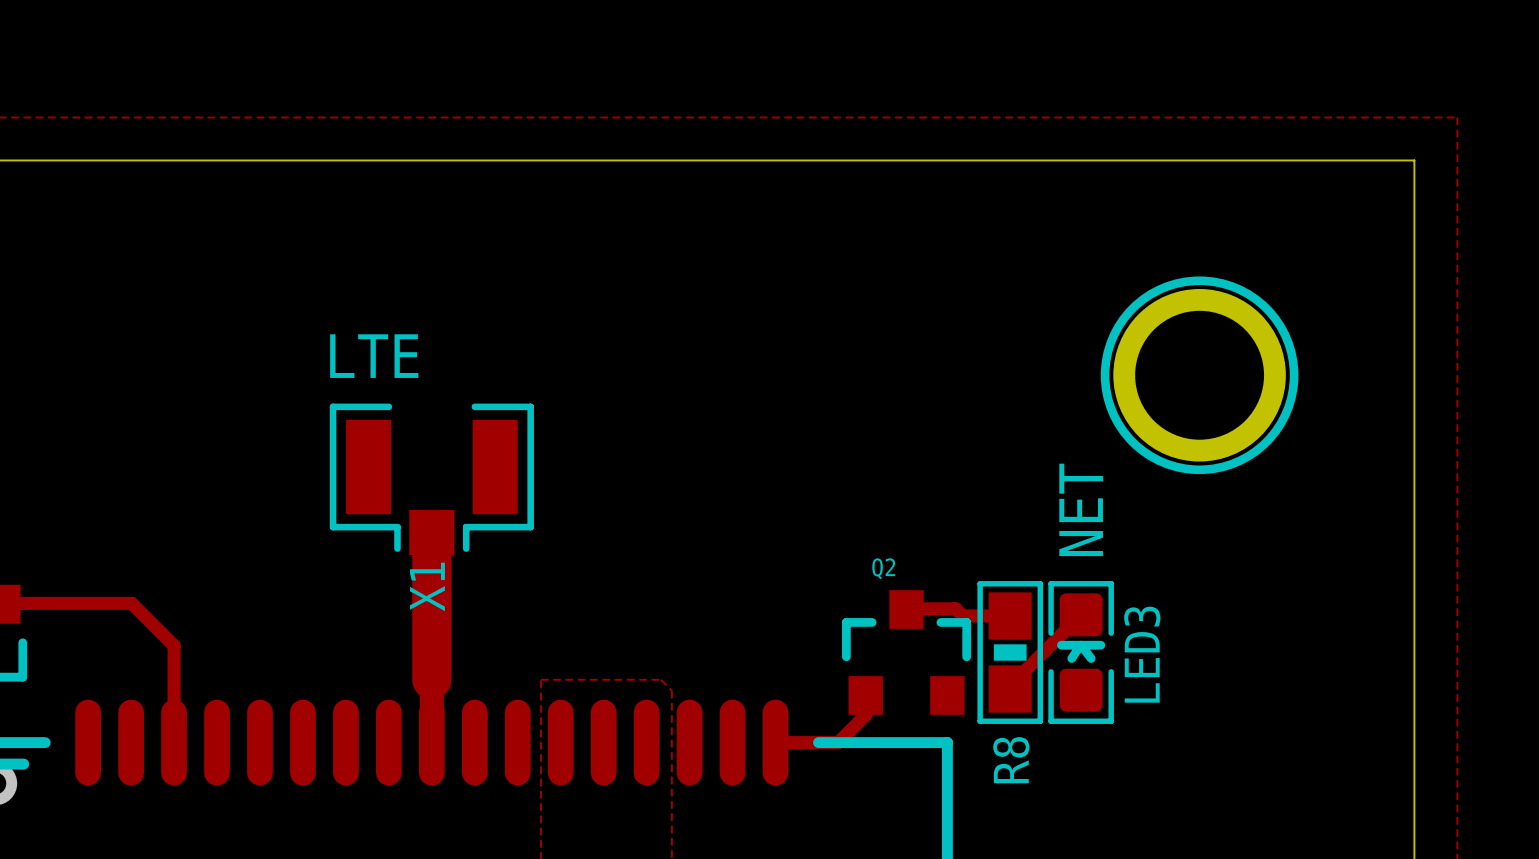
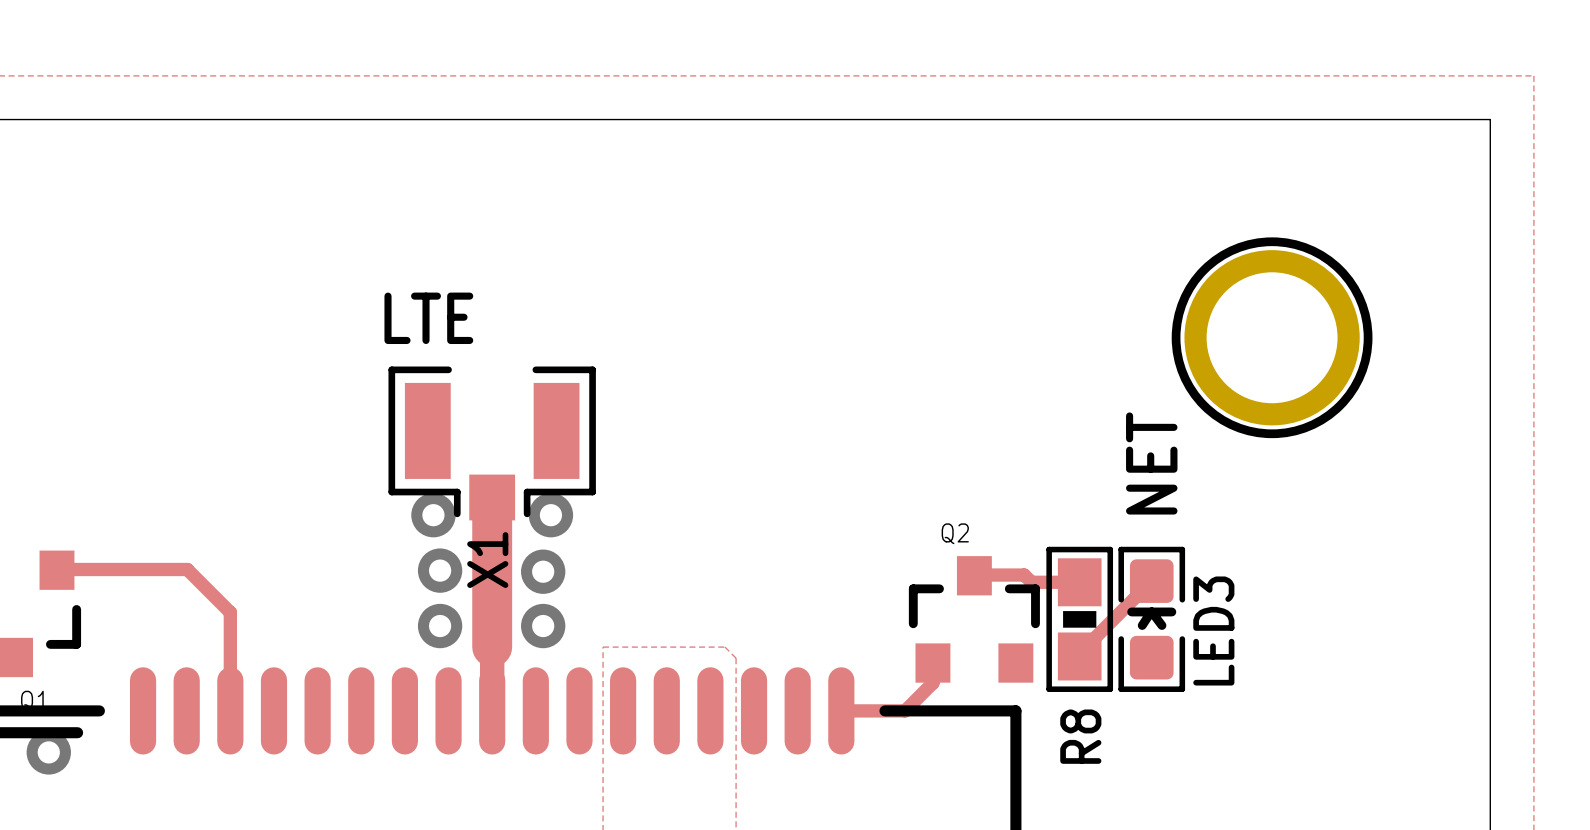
via: none -> (433, 515)
via: none -> (550, 515)
via: none -> (440, 570)
via: none -> (543, 571)
via: none -> (440, 626)
via: none -> (543, 626)

